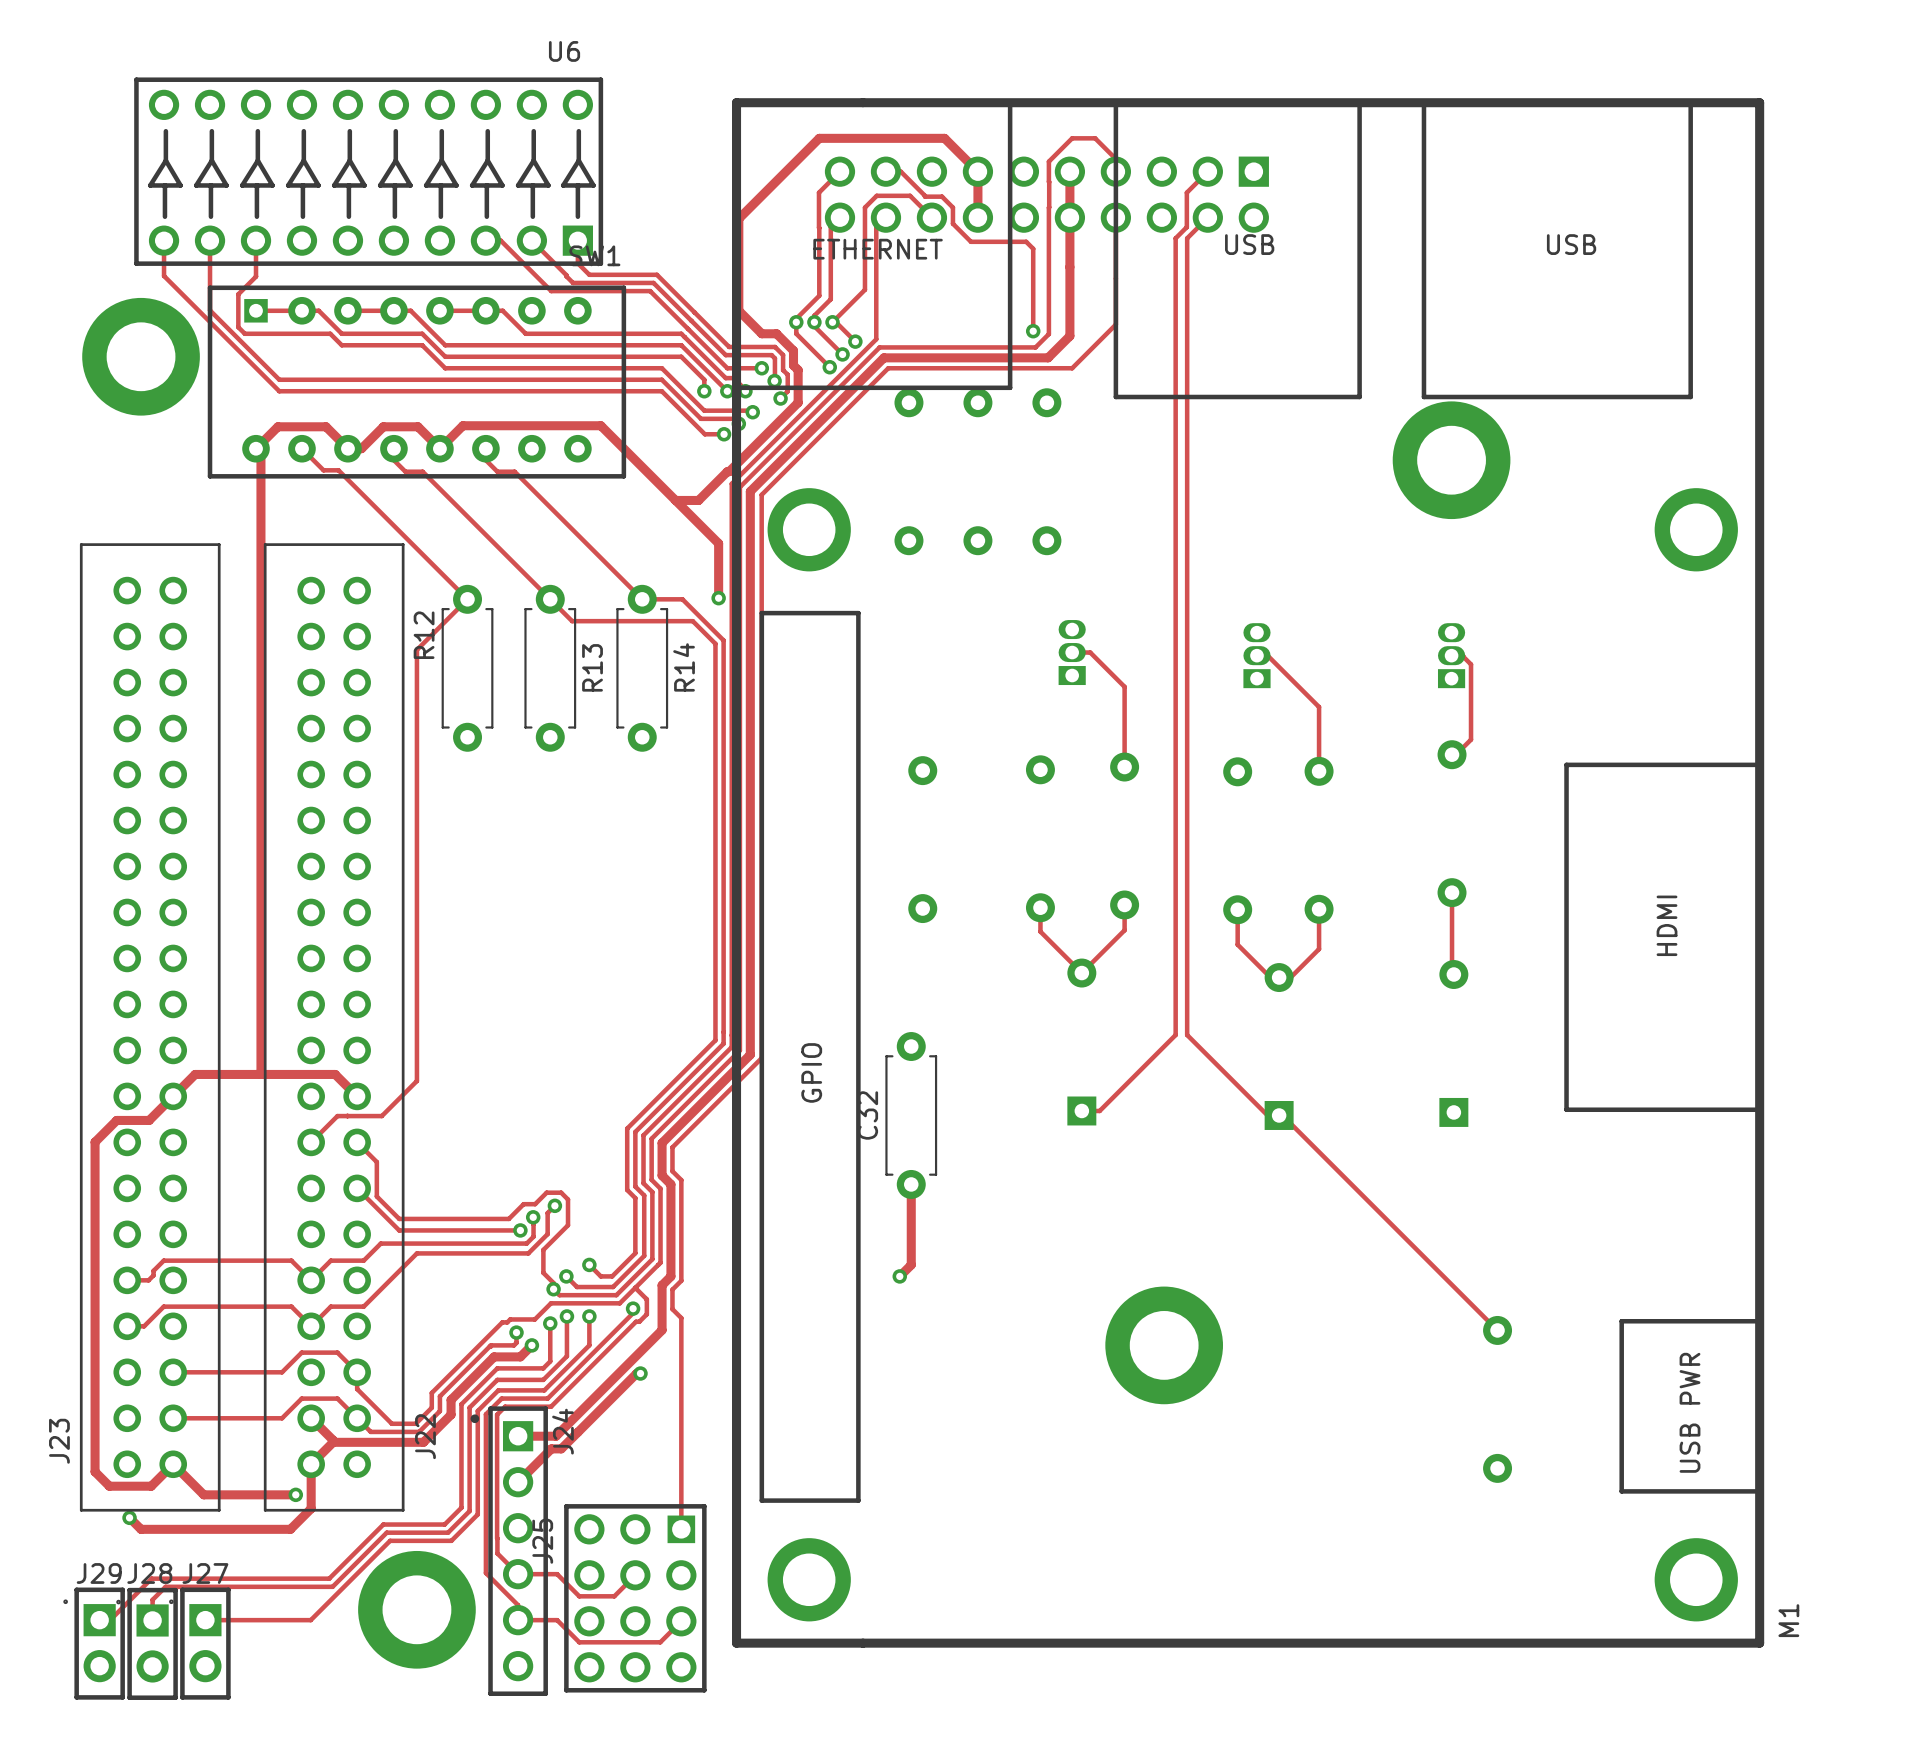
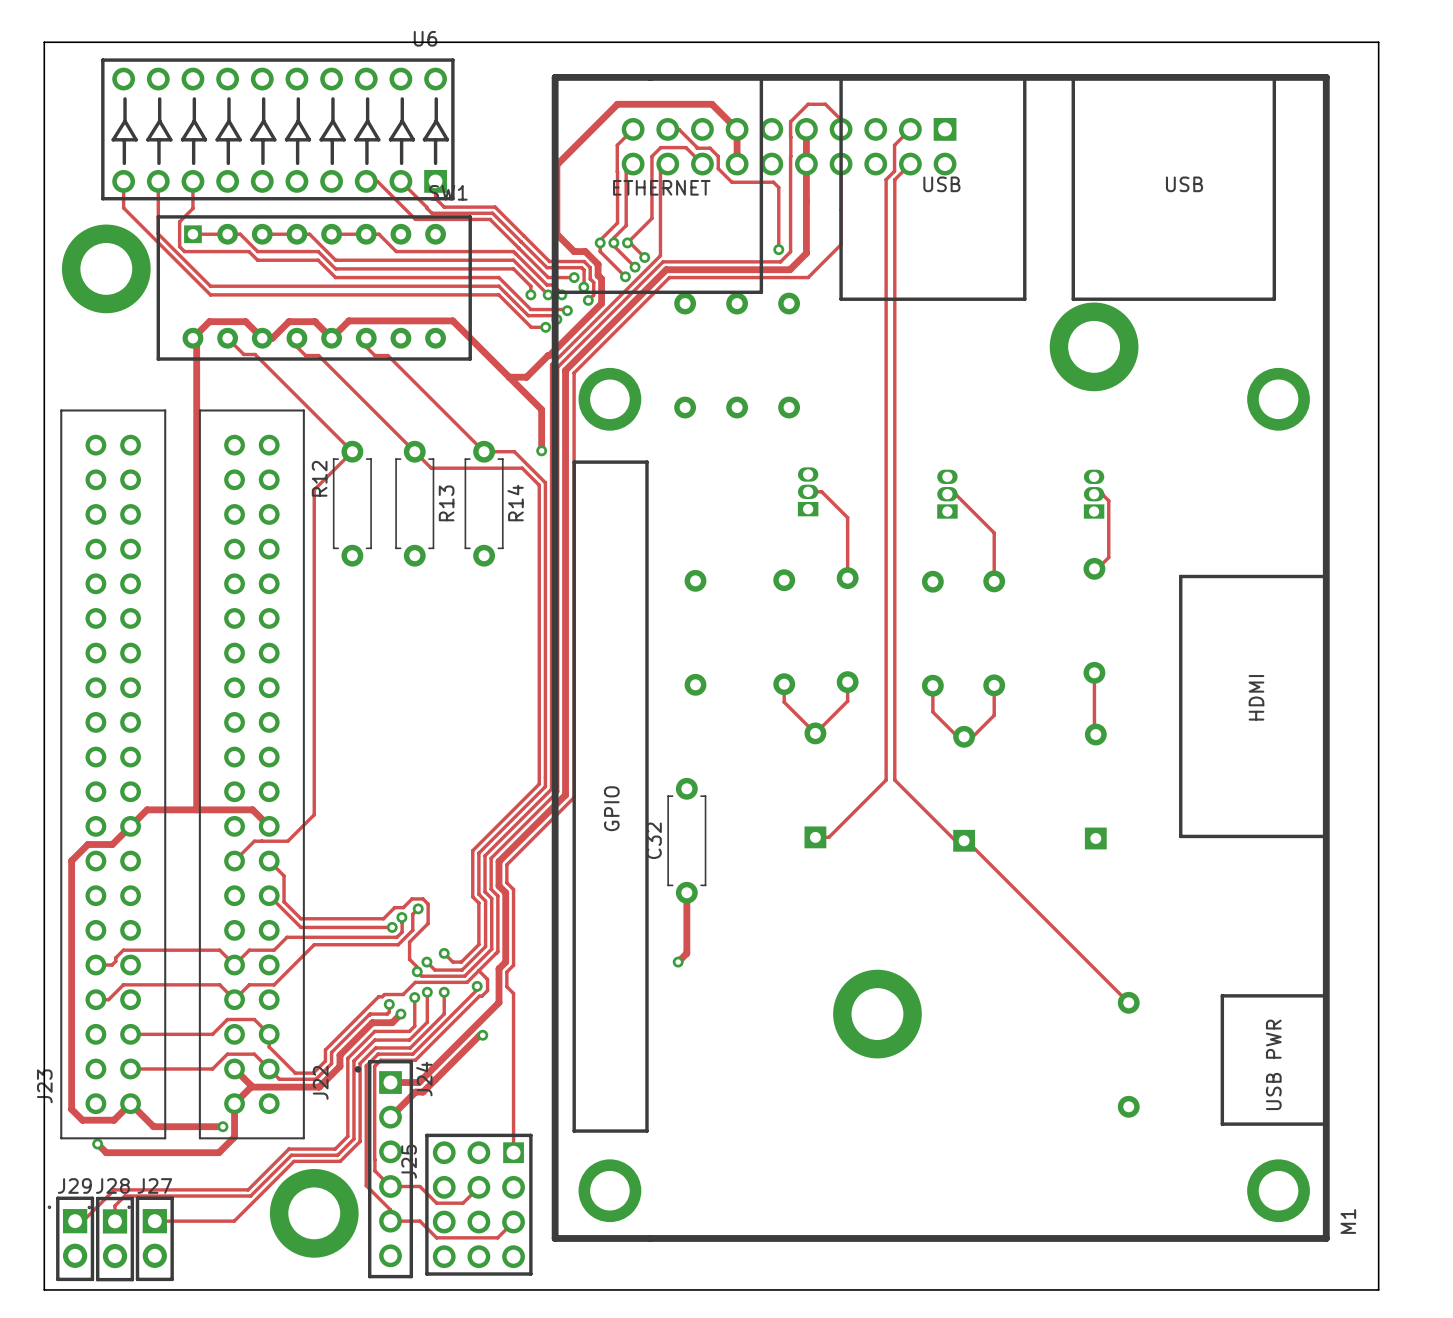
board edge: none -> (44, 42) (1378, 42) (1378, 1289) (44, 1289) (44, 42)

